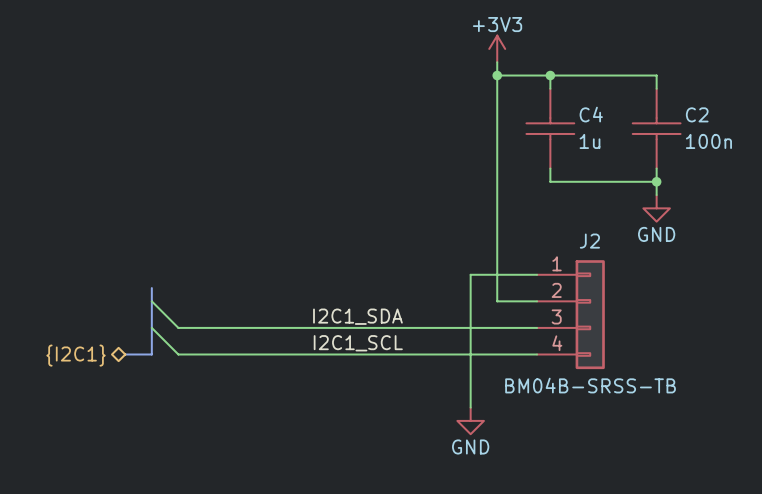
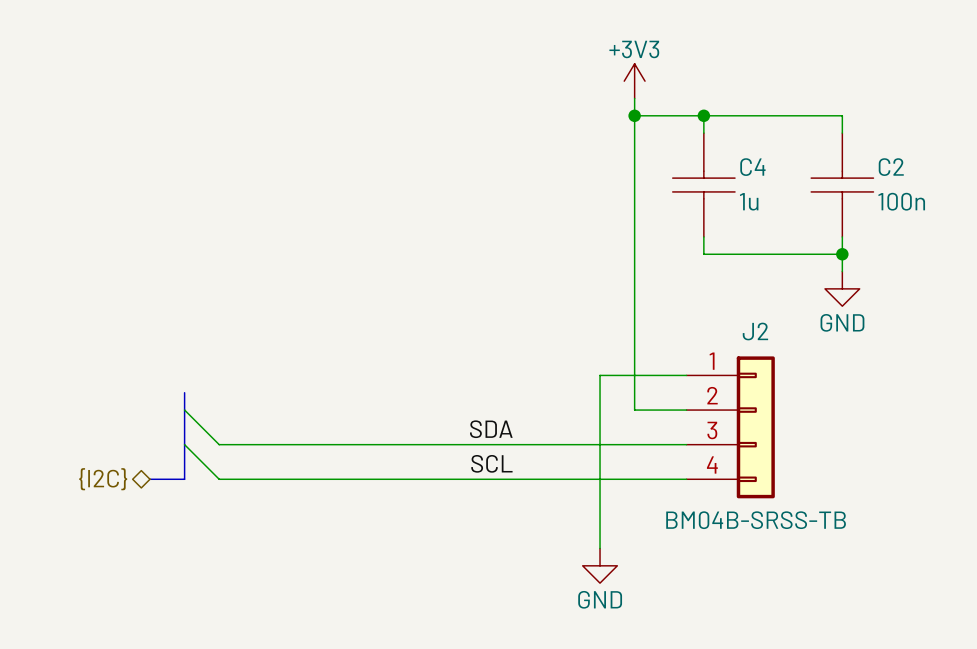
label: I2C1_SDA (357, 316) -> SDA (491, 429)
label: I2C1_SCL (358, 343) -> SCL (491, 463)
hierarchical label: {I2C1} (76, 355) -> {I2C} (103, 479)

